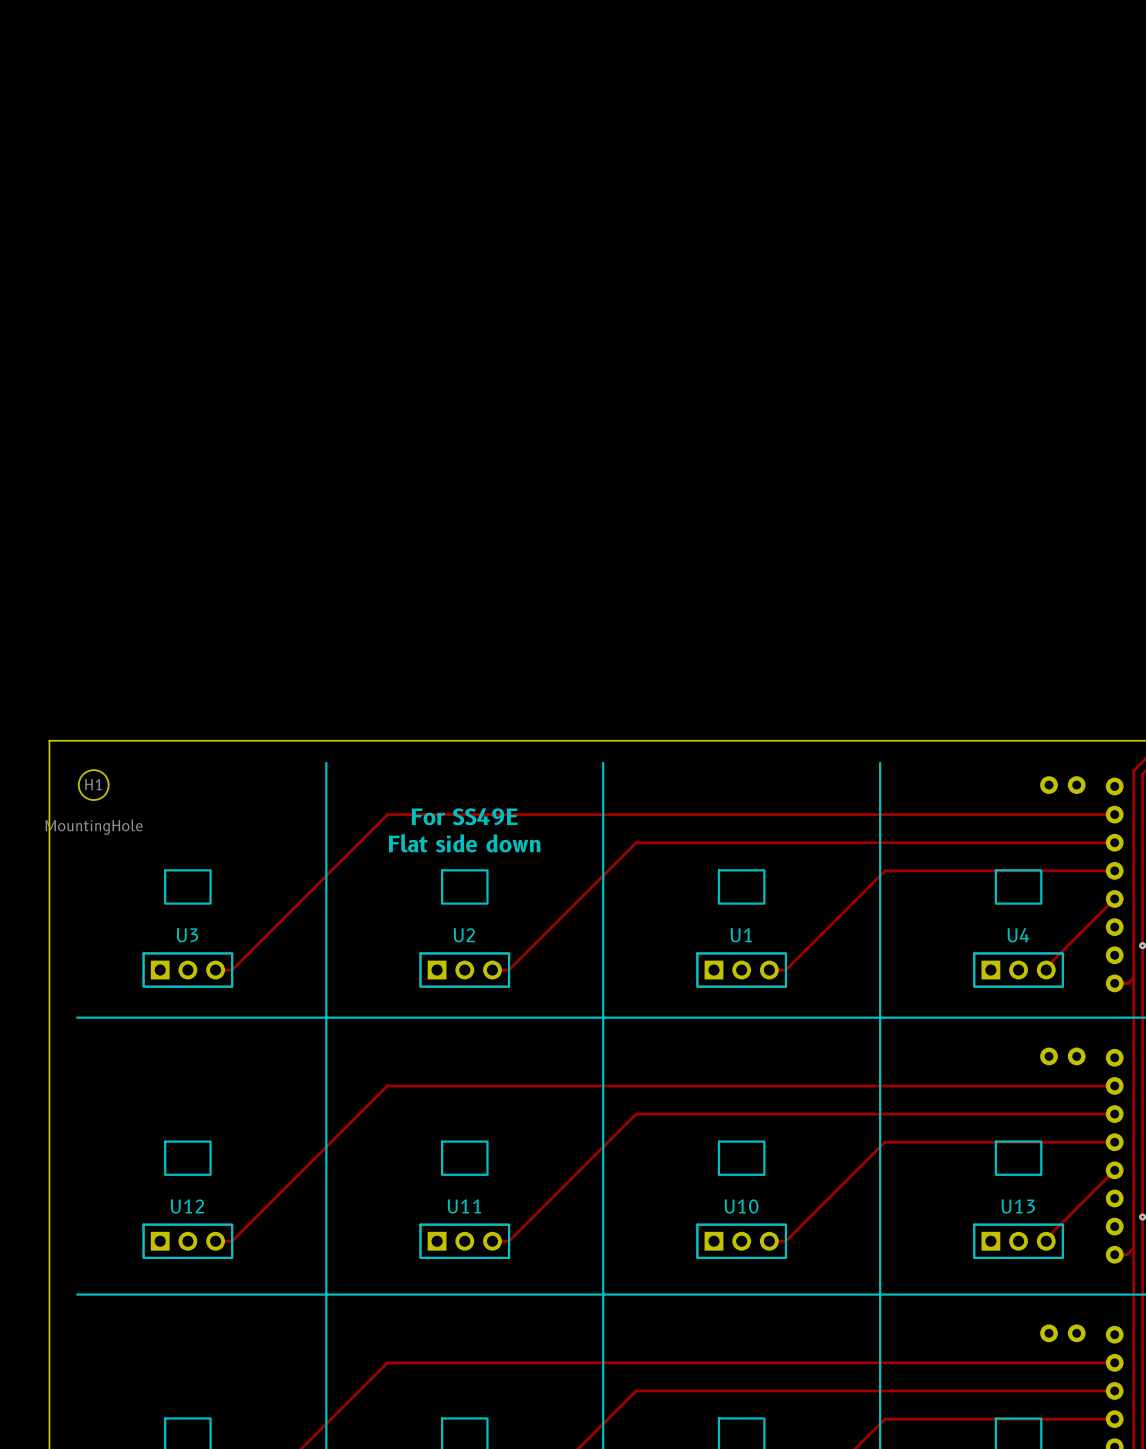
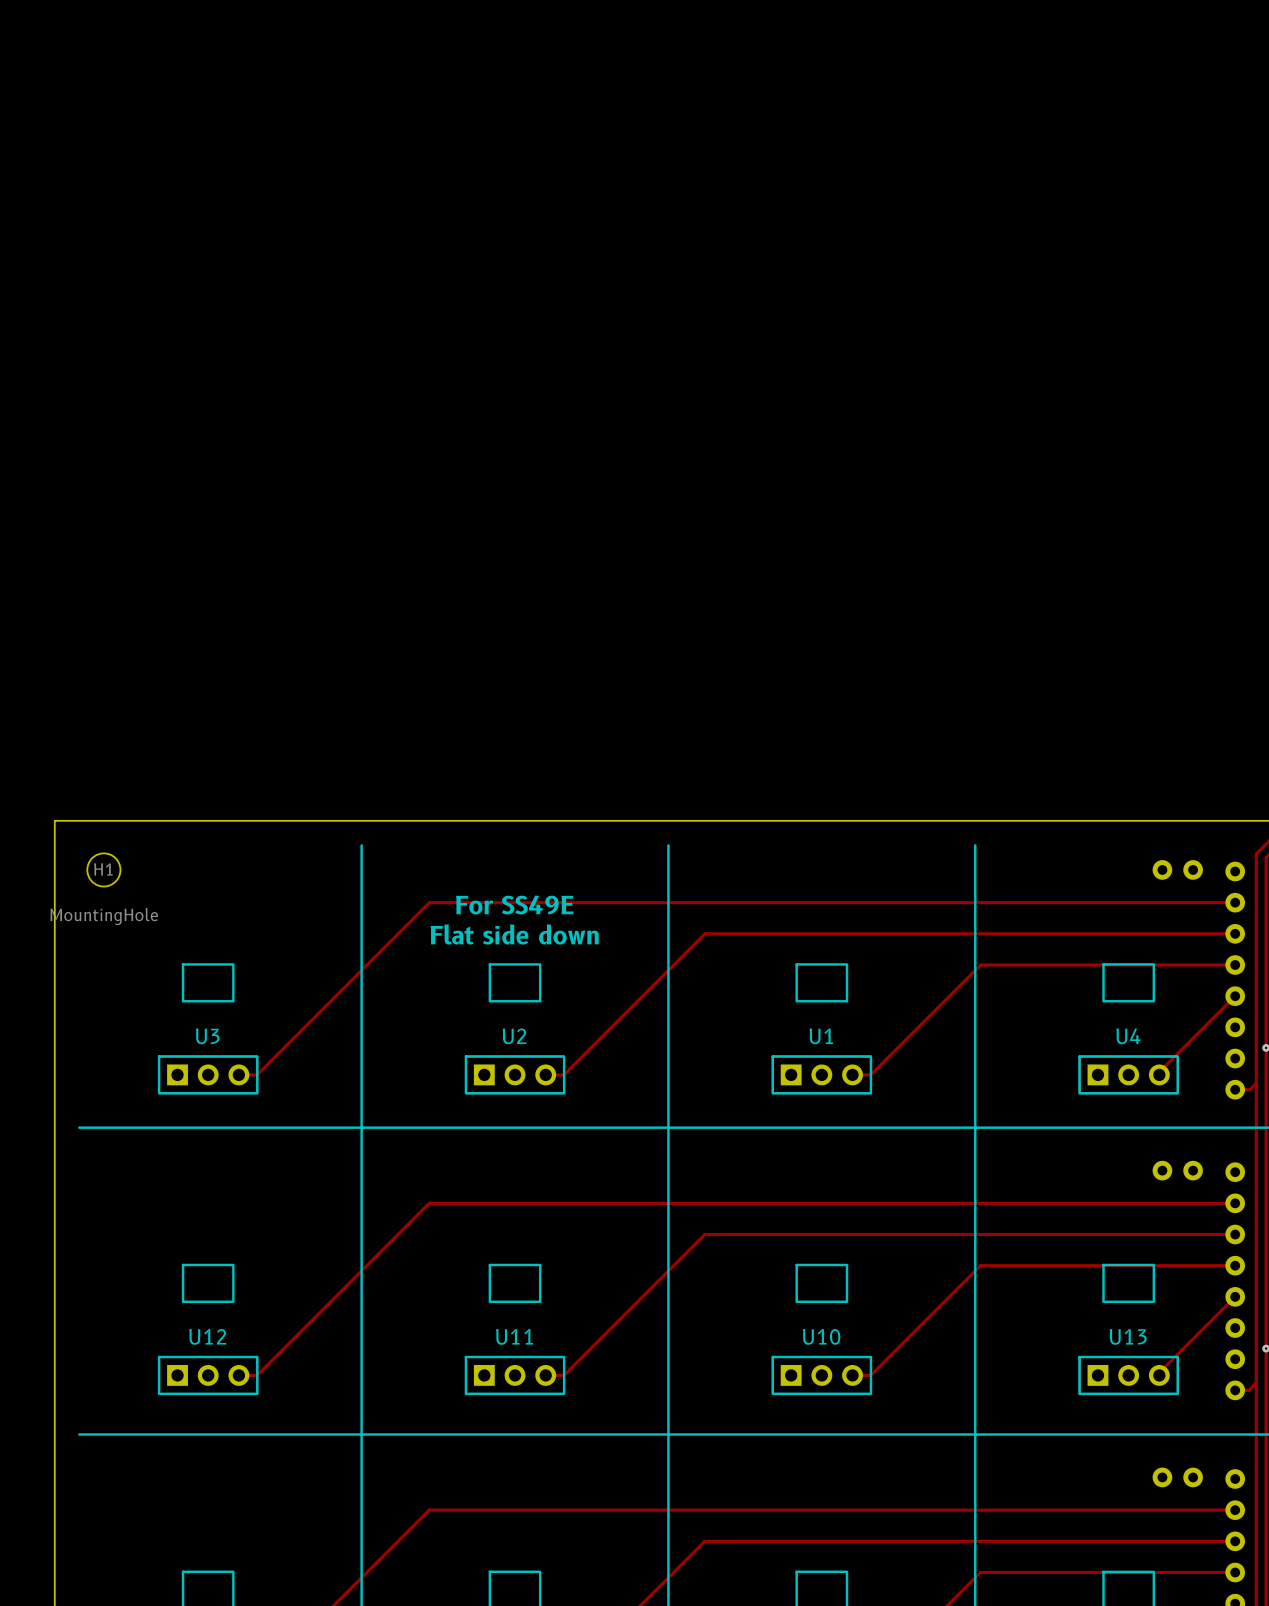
line: none -> (79, 1127) (85, 1127)
line: none -> (79, 1434) (85, 1434)

